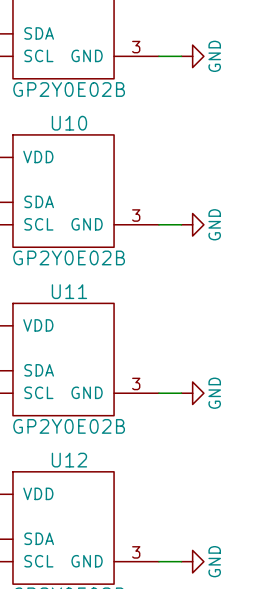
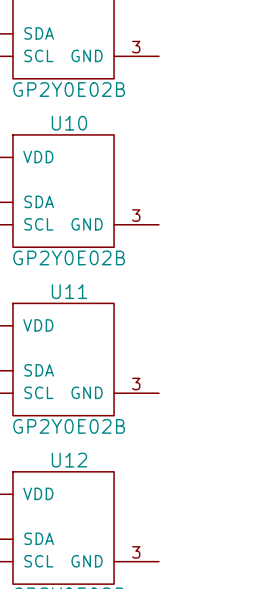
wire: (158, 56) (181, 56) -> none
power symbol: GND (192, 56) -> none
wire: (158, 224) (181, 224) -> none
power symbol: GND (192, 224) -> none
wire: (158, 393) (181, 393) -> none
power symbol: GND (192, 393) -> none
wire: (158, 561) (181, 561) -> none
power symbol: GND (192, 561) -> none

